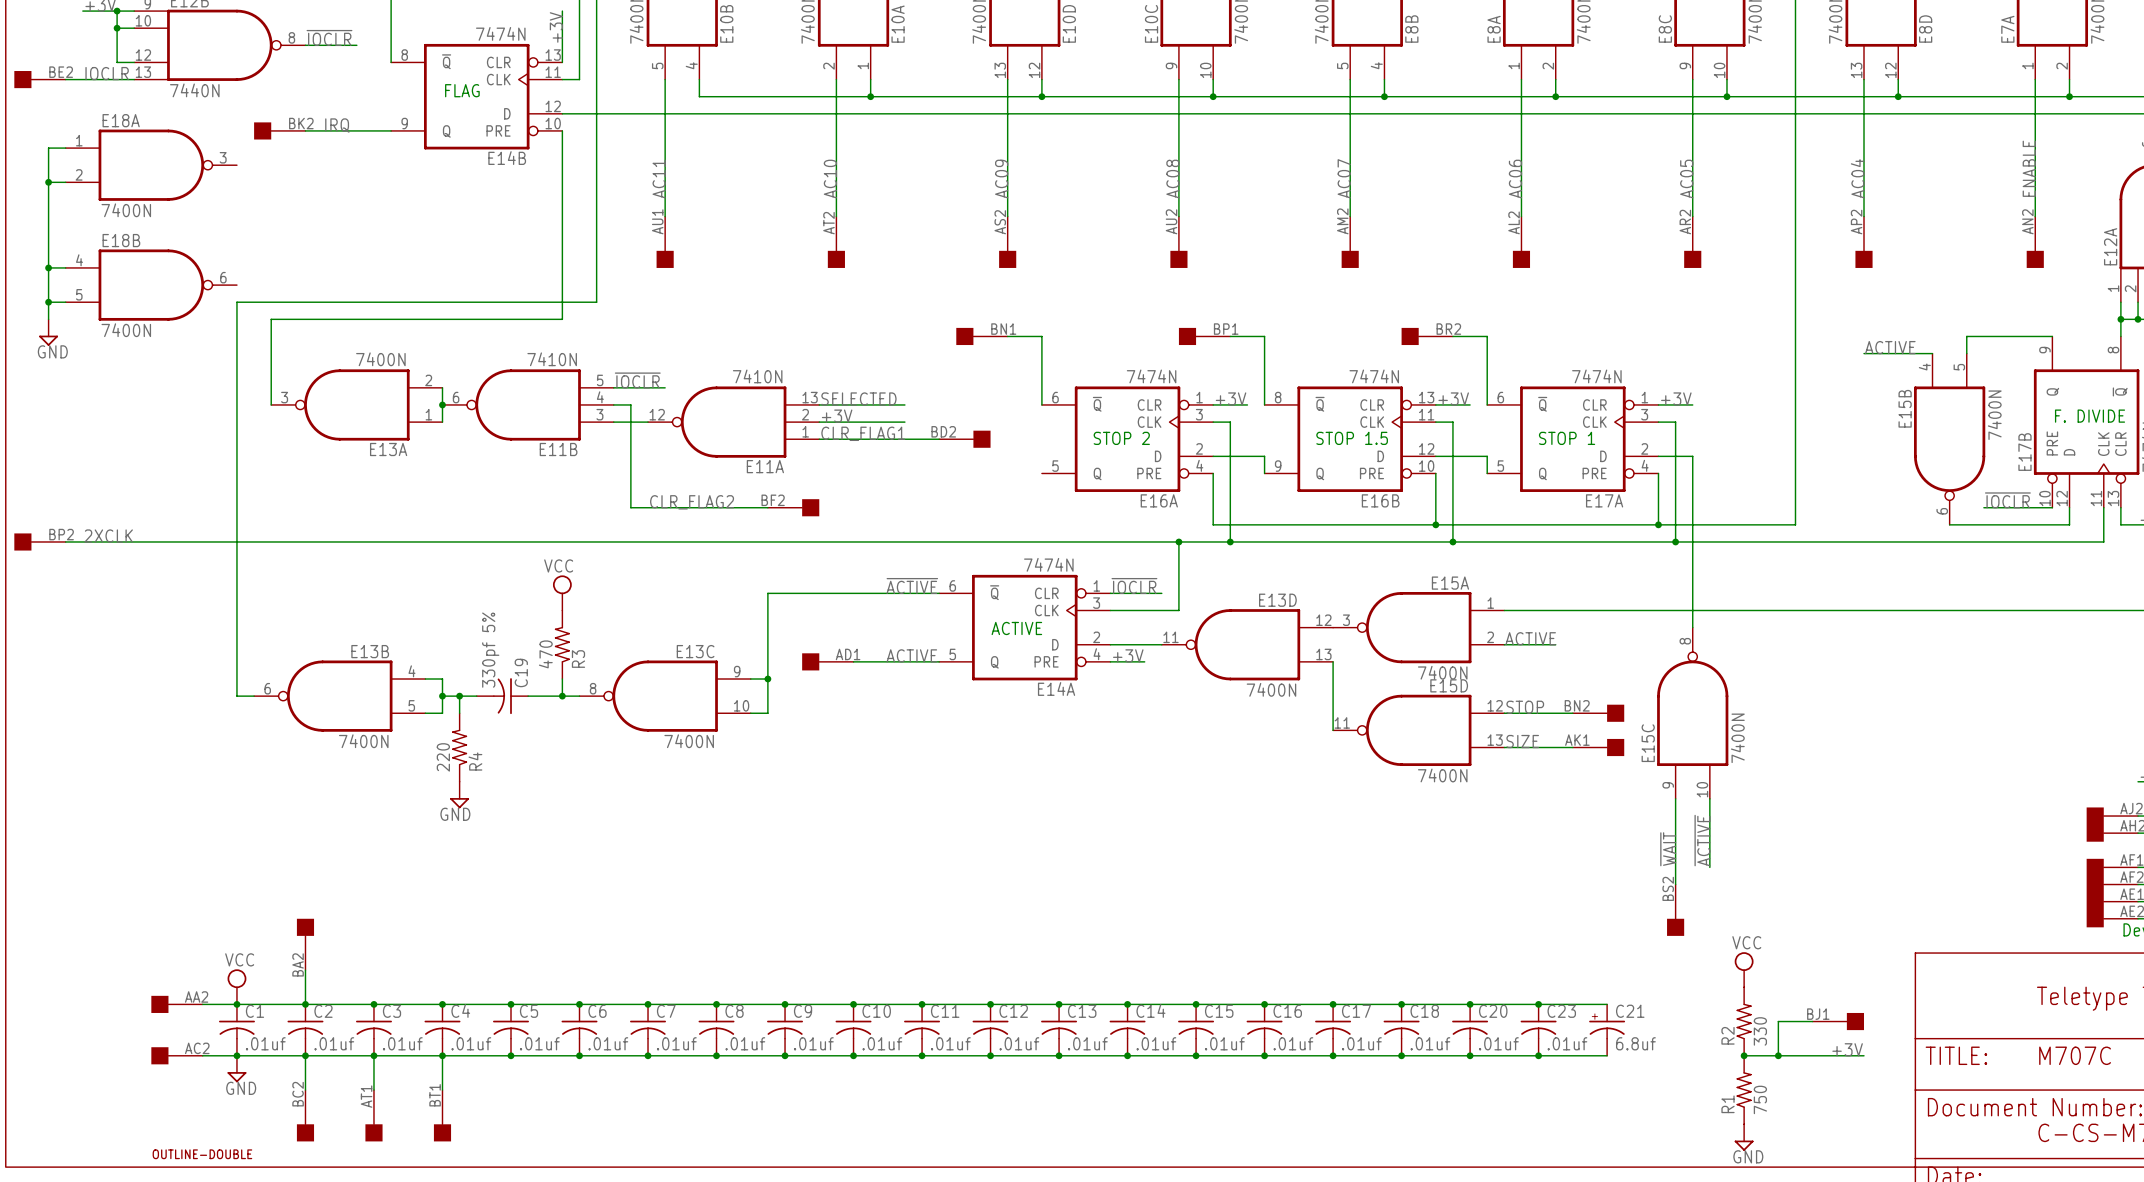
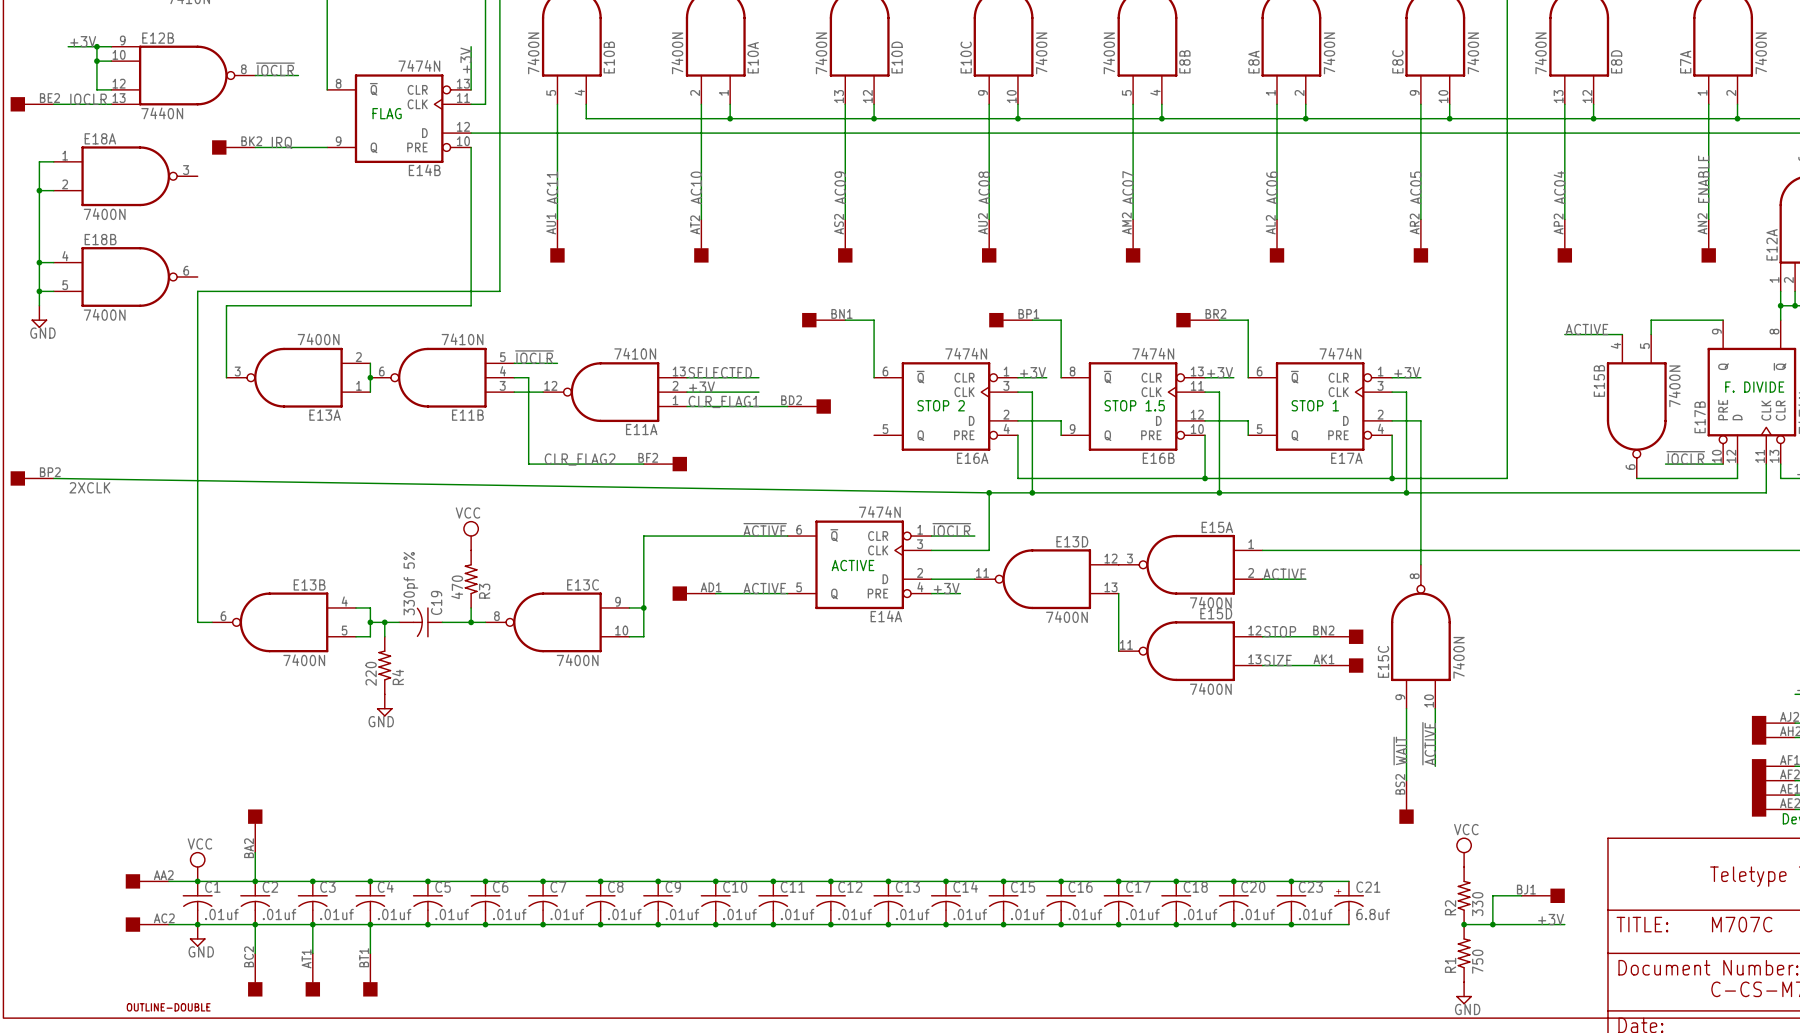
part position: (40, 541) -> (32, 478)
wire: (65, 541) (1178, 541) -> (53, 478) (989, 492)

